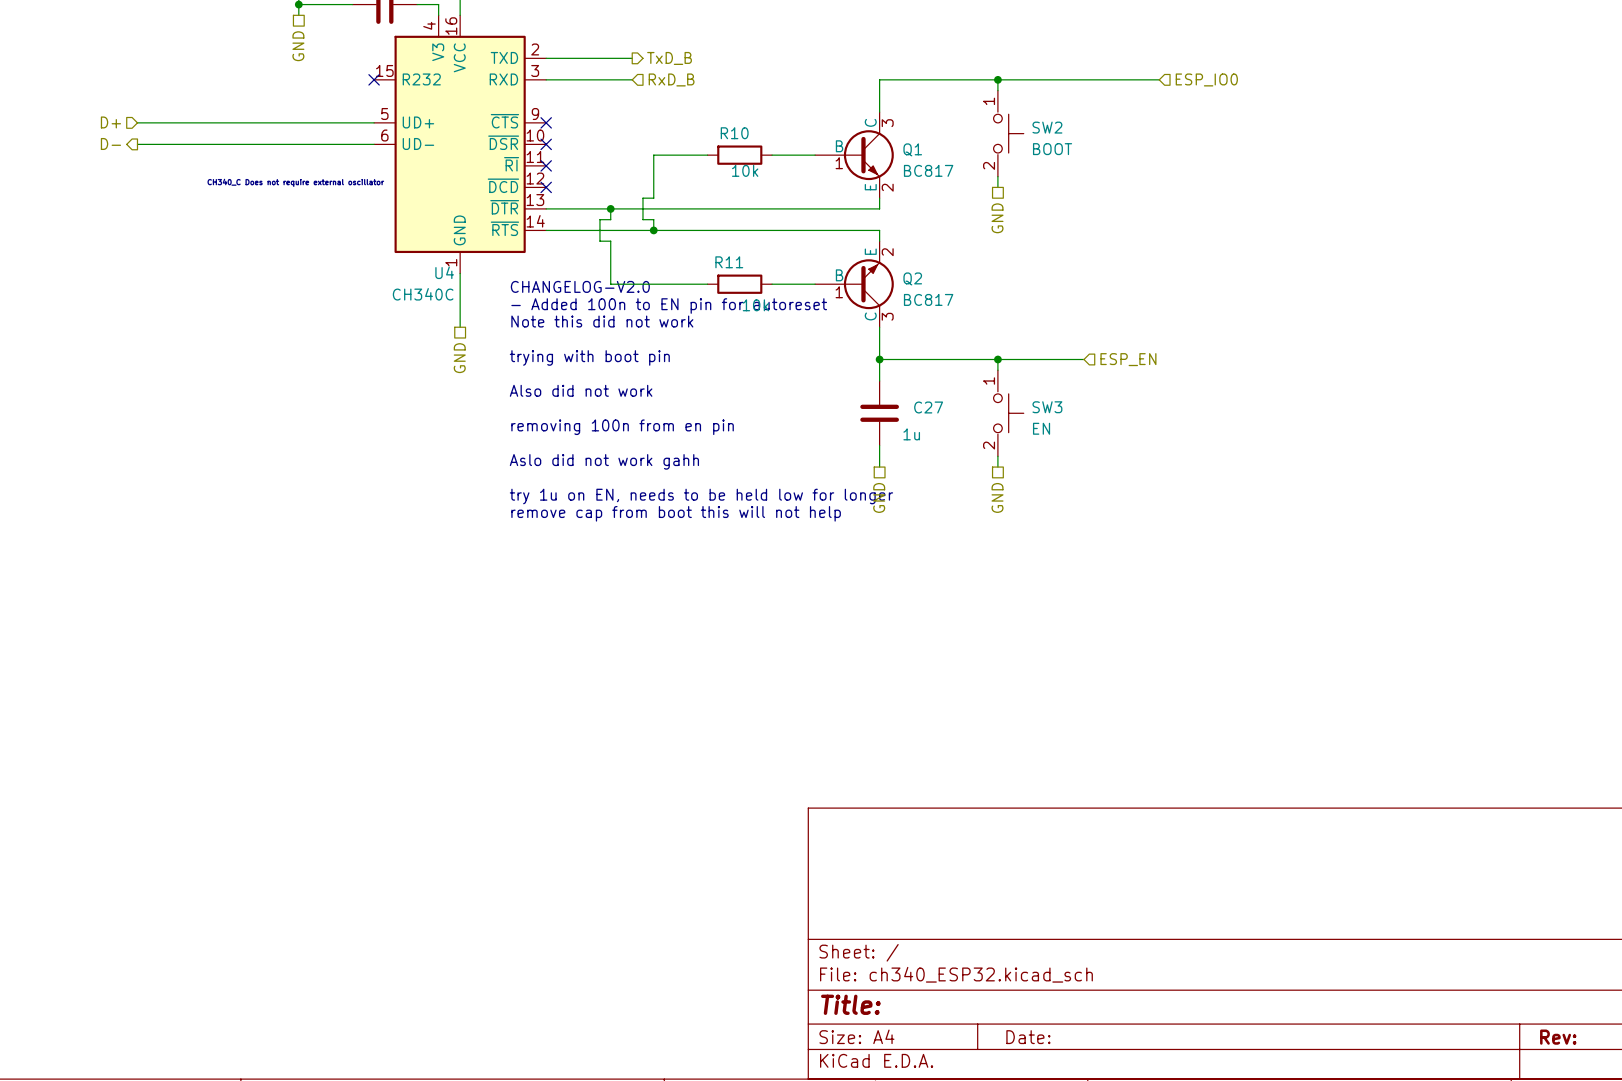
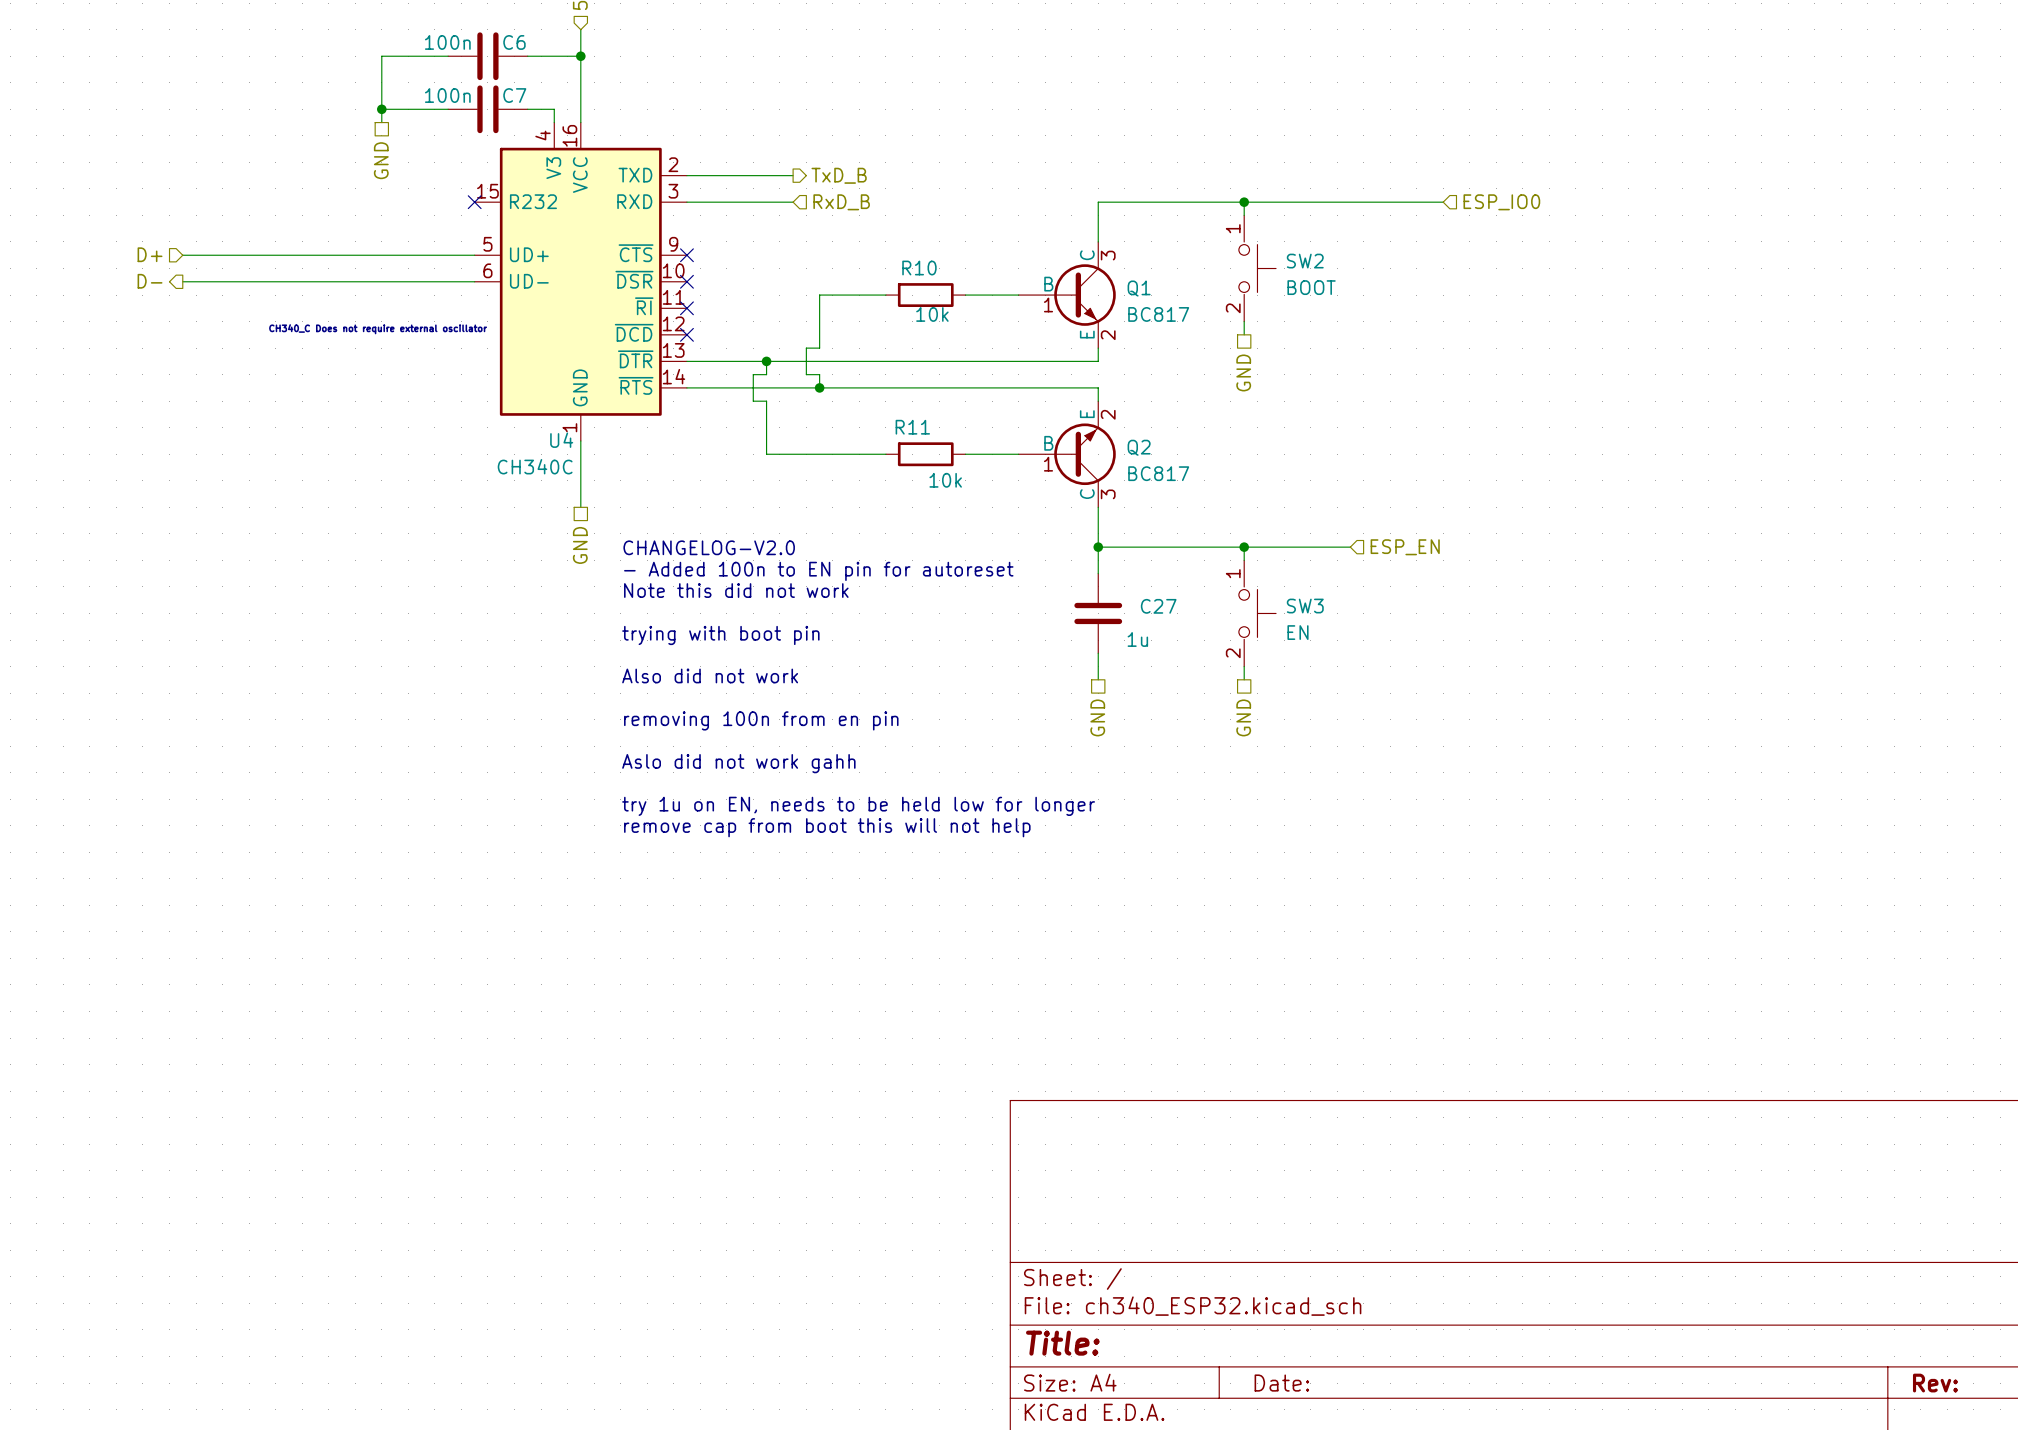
text position: CHANGELOG-V2.0 (580, 286) -> CHANGELOG-V2.0 (709, 547)
text position: - Added 100n to EN pin for autoreset (669, 306) -> - Added 100n to EN pin for autoreset (818, 571)
text position: Note this did not work (602, 321) -> Note this did not work (736, 590)
text position: trying with boot pin (589, 357) -> trying with boot pin (720, 635)
text position: Also did not work (581, 390) -> Also did not work (710, 675)
text position: removing 100n from en pin (622, 427) -> removing 100n from en pin (761, 720)
text position: Aslo did not work gahh (604, 461) -> Aslo did not work gahh (738, 763)
text position: try 1u on EN, needs to be held low for longer (701, 496) -> try 1u on EN, needs to be held low for longer (858, 806)
text position: remove cap from boot this will not help (676, 513) -> remove cap from boot this will not help (827, 827)

